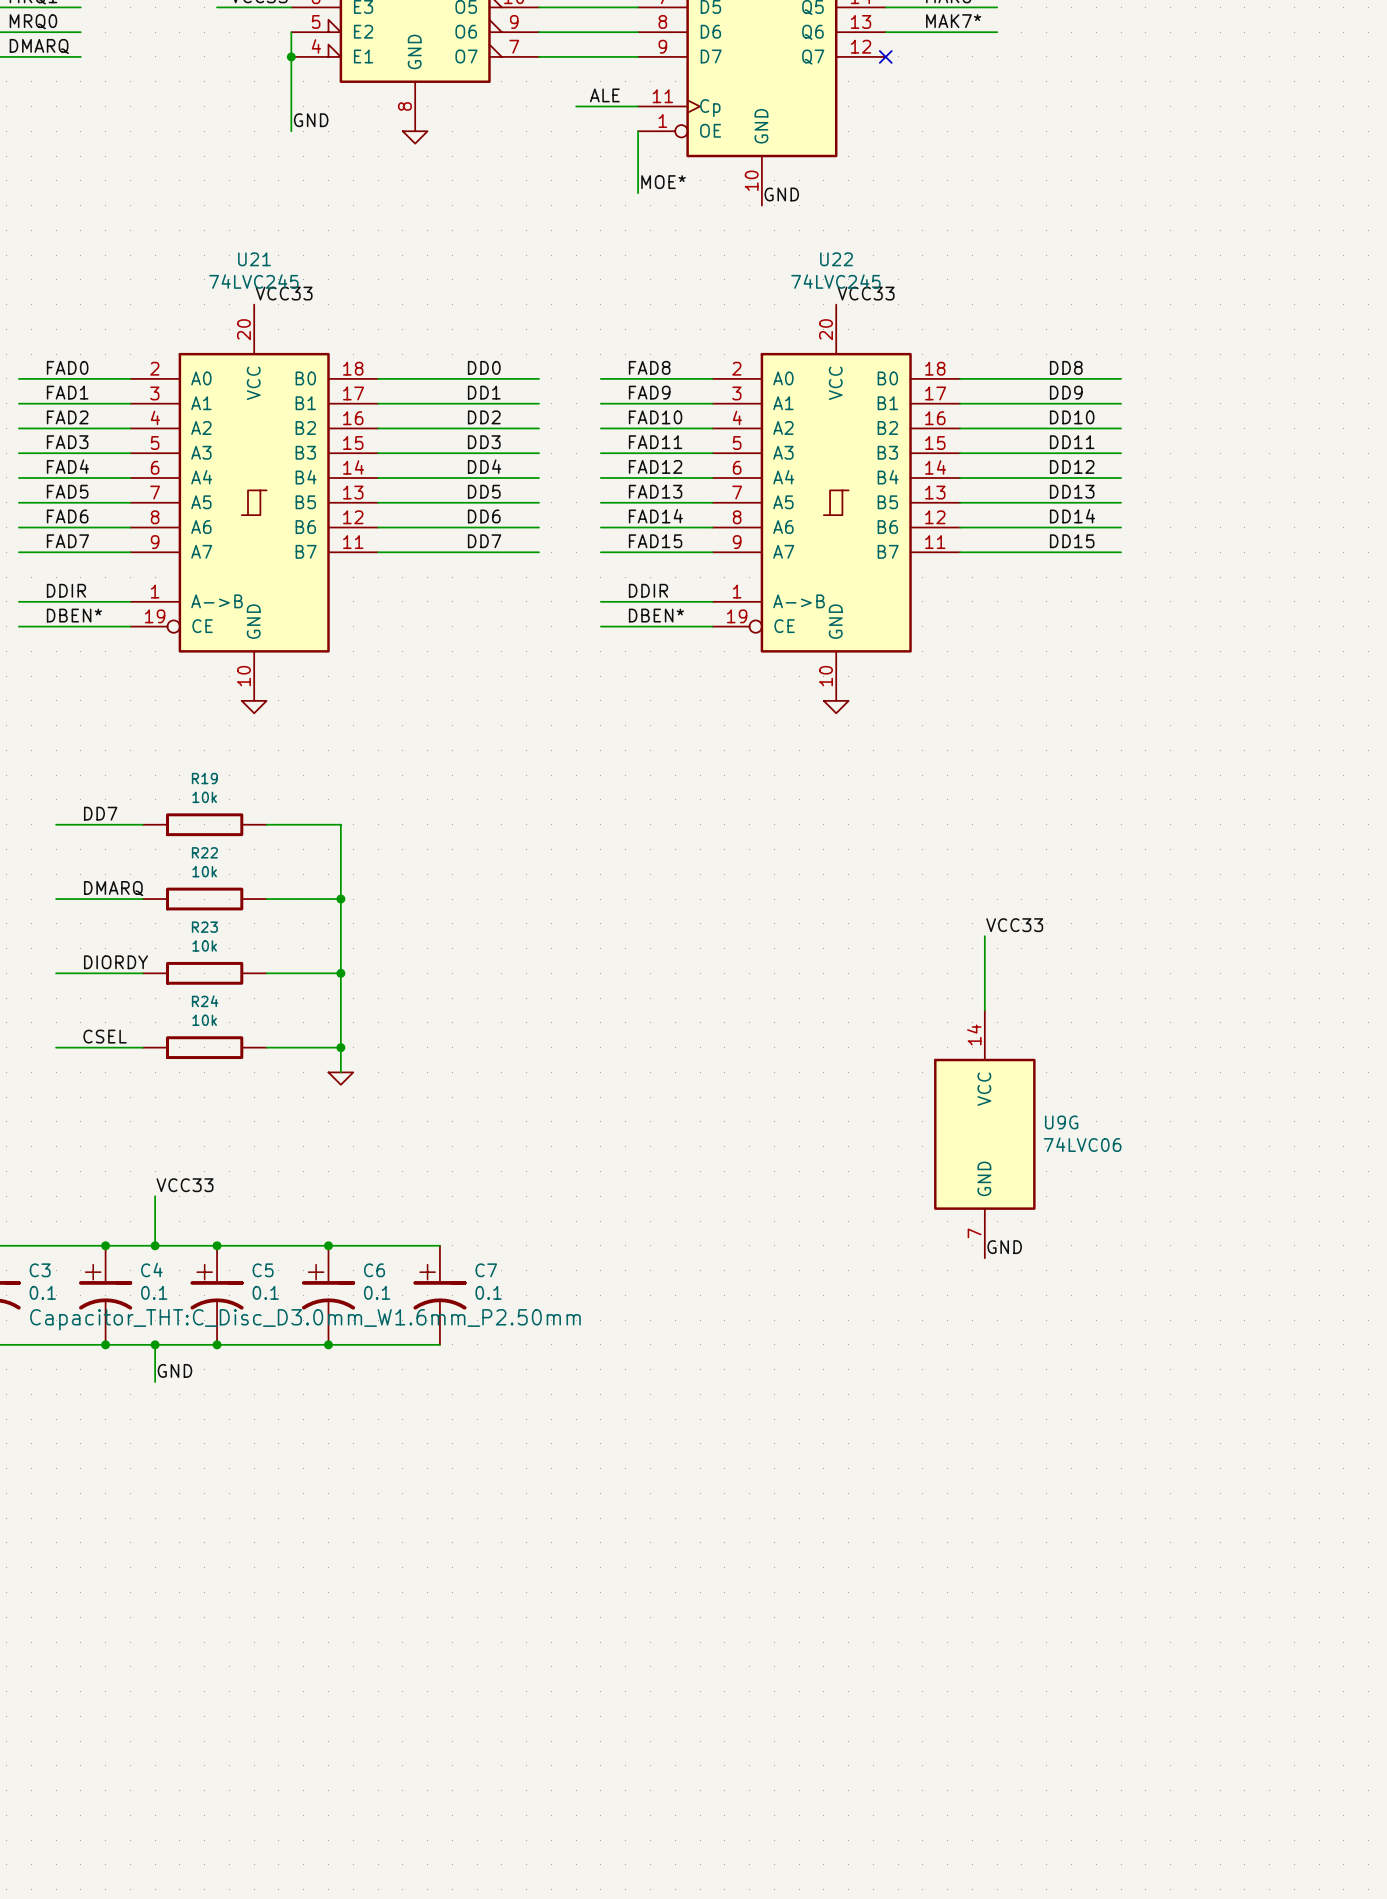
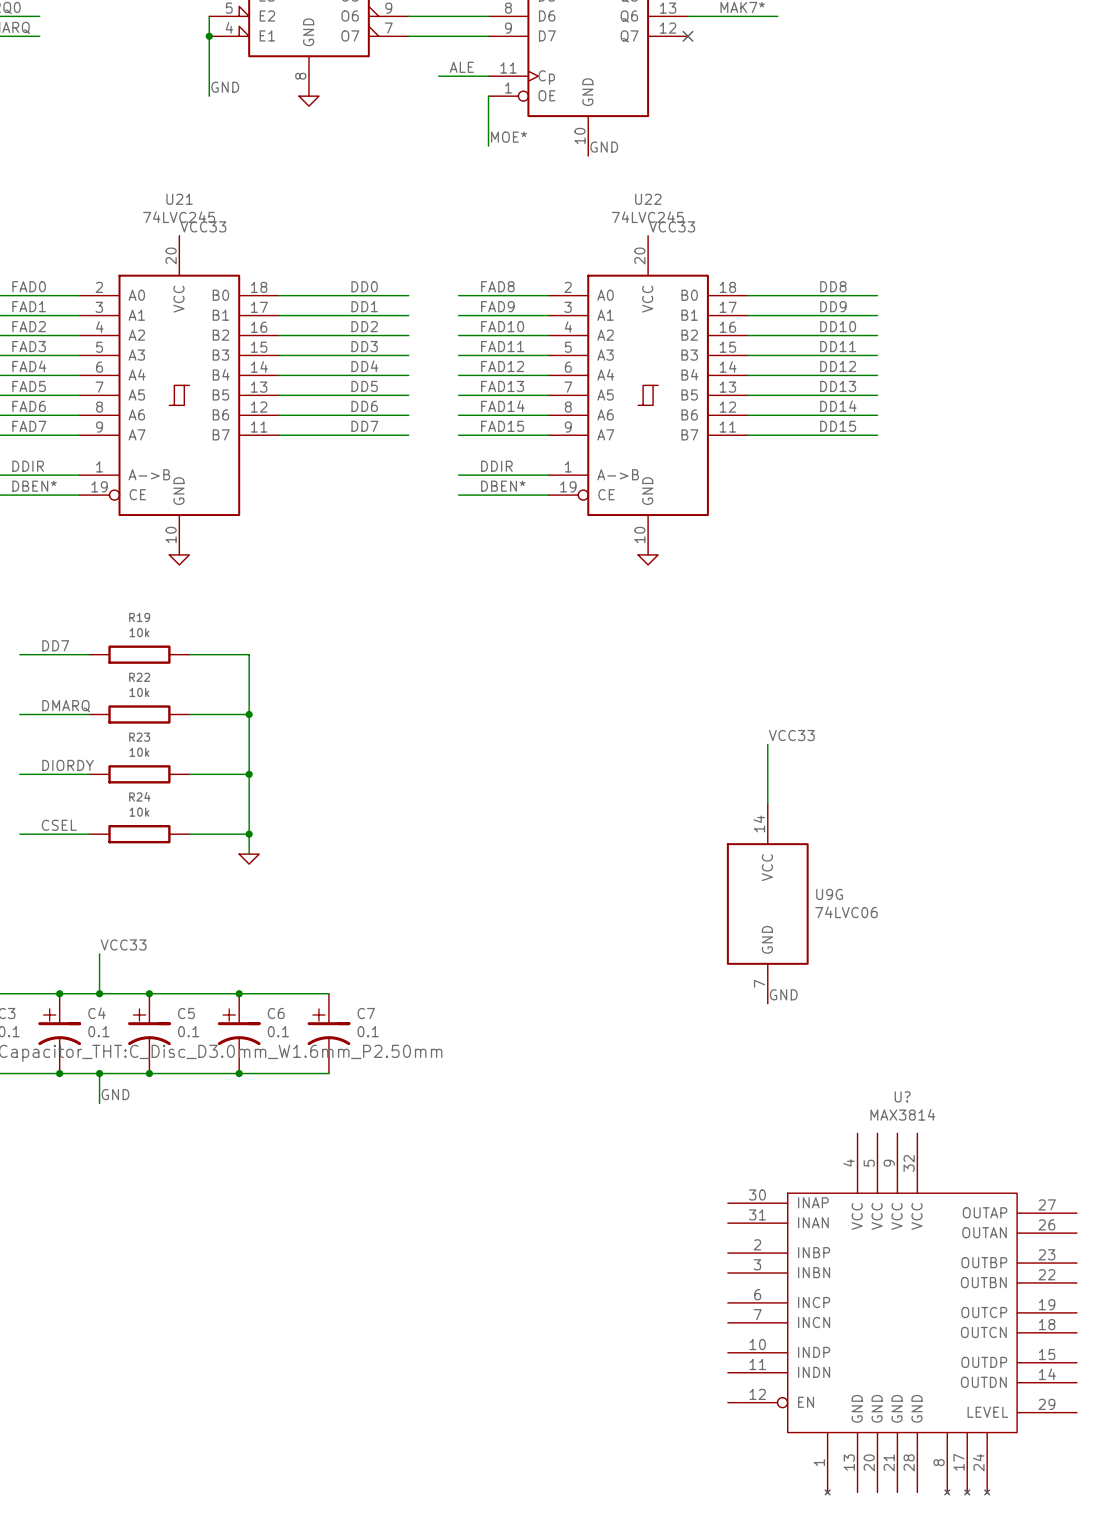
U?: none -> MAX3814 (902, 1314)

